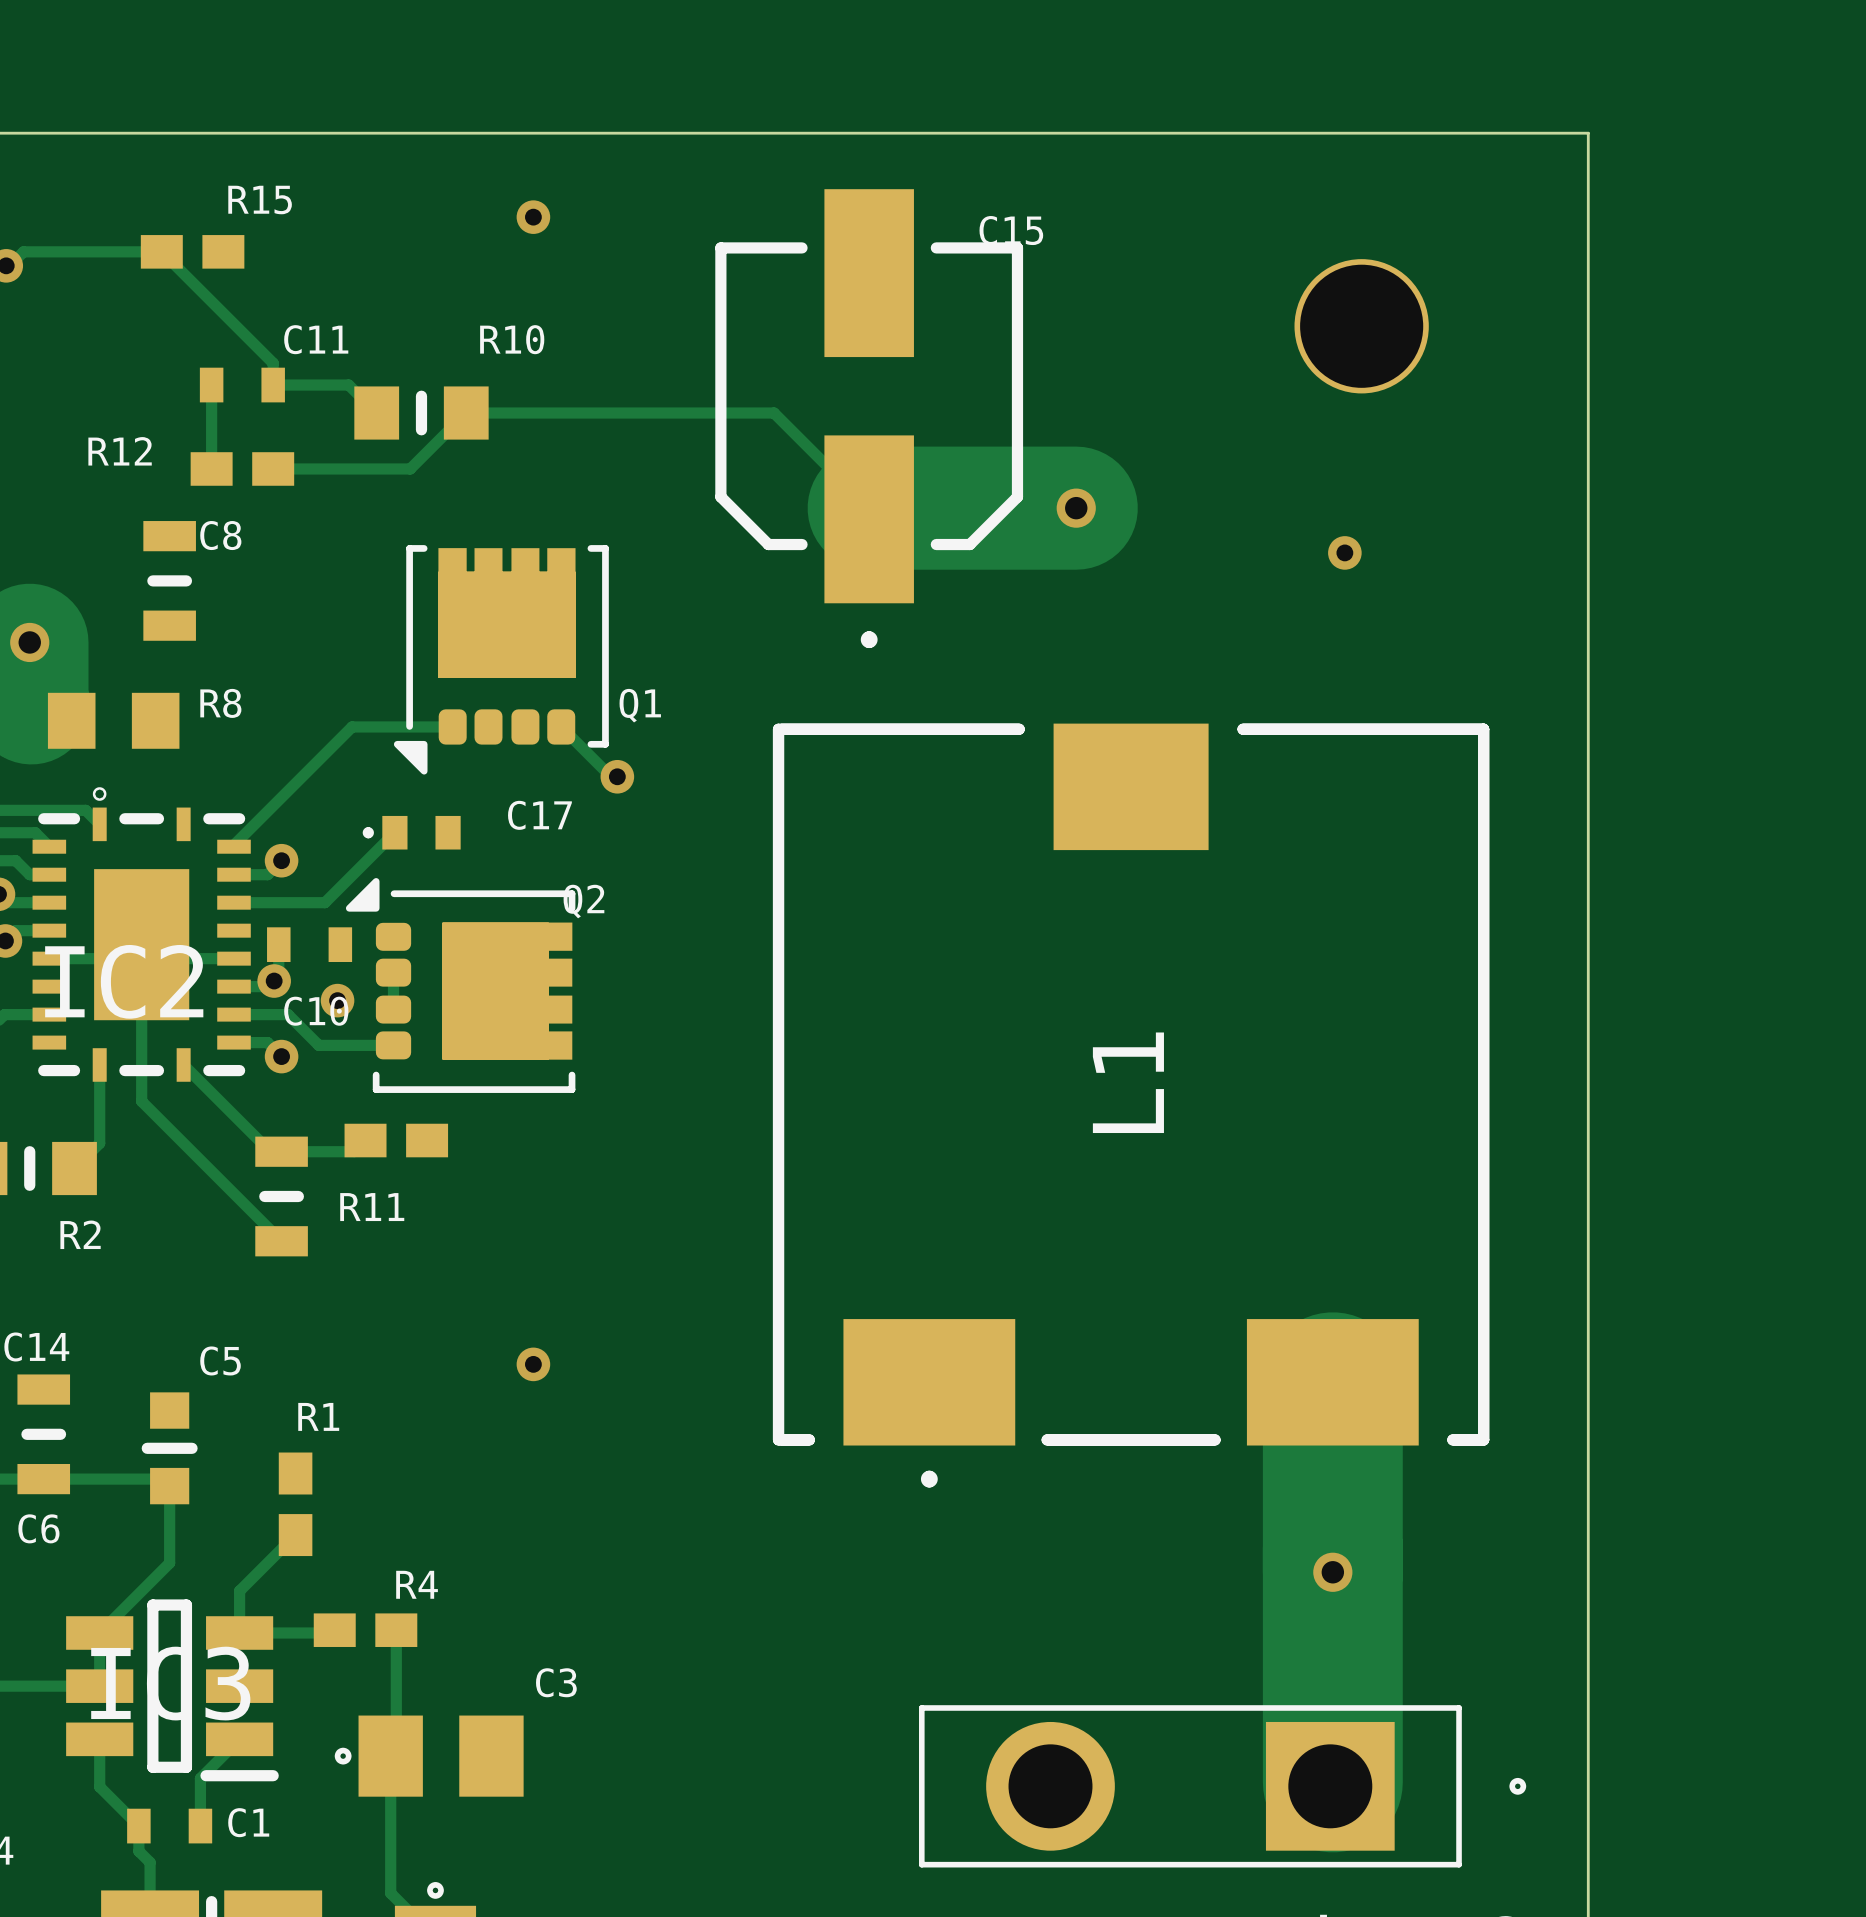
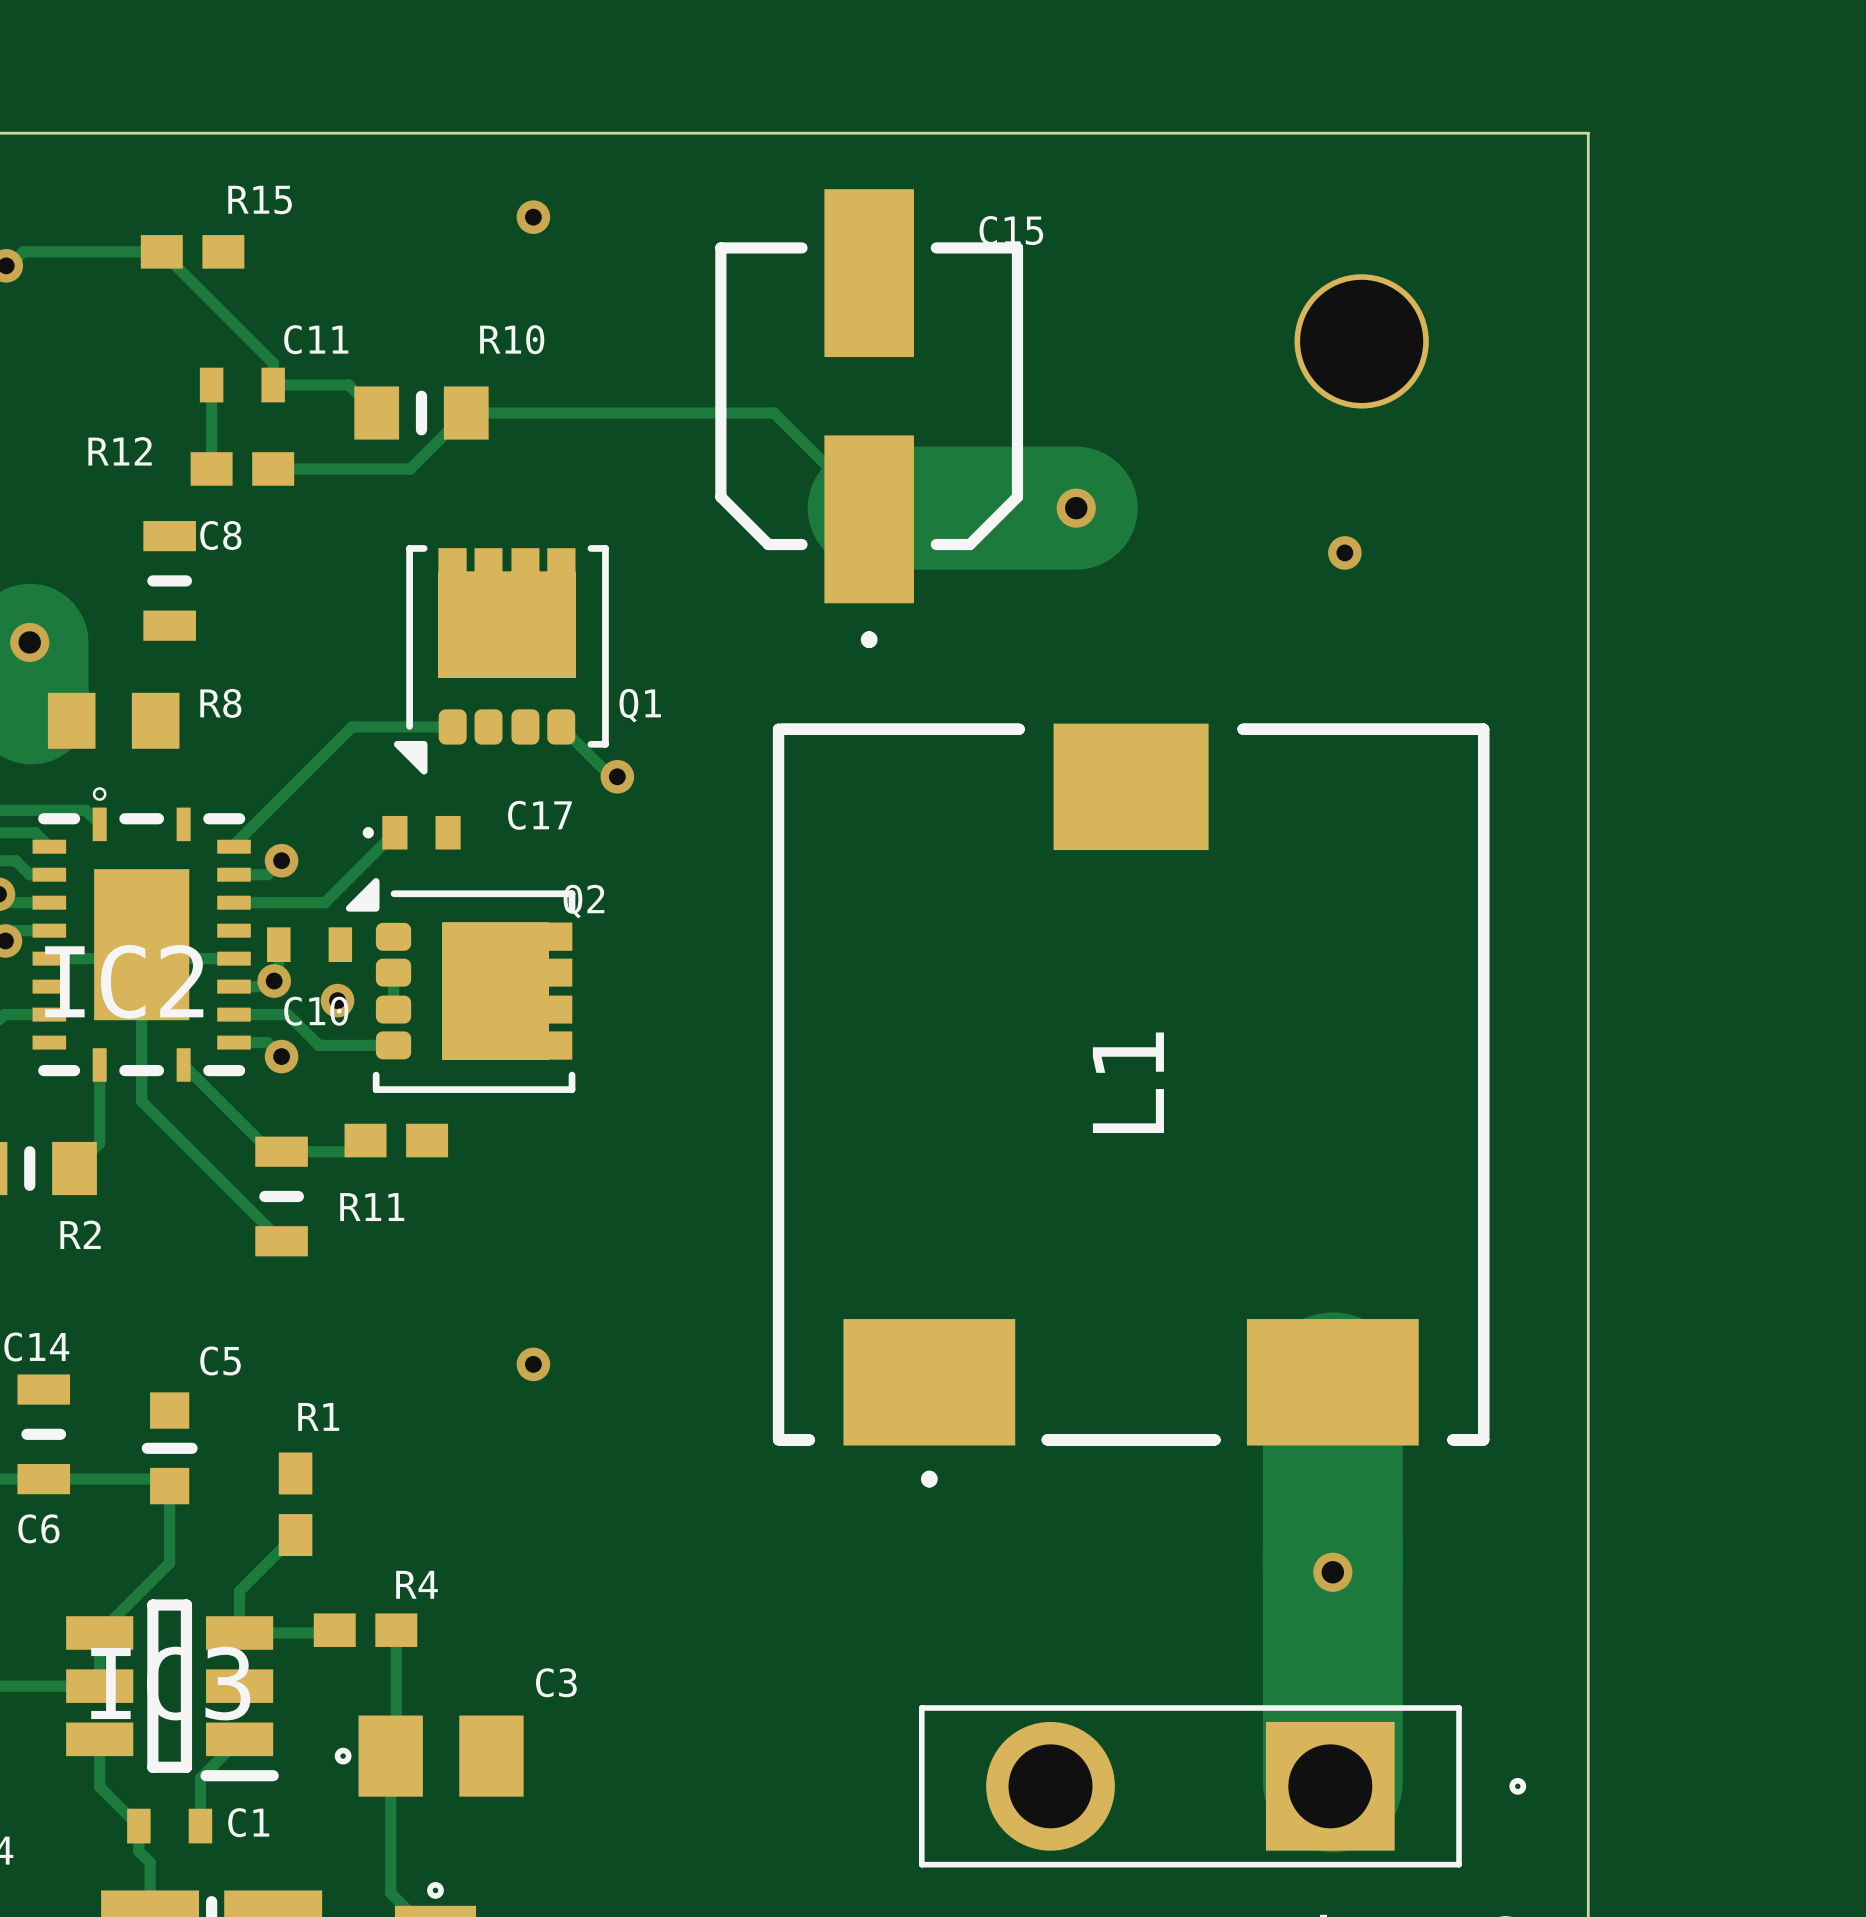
part position: (1361, 326) -> (1361, 341)

